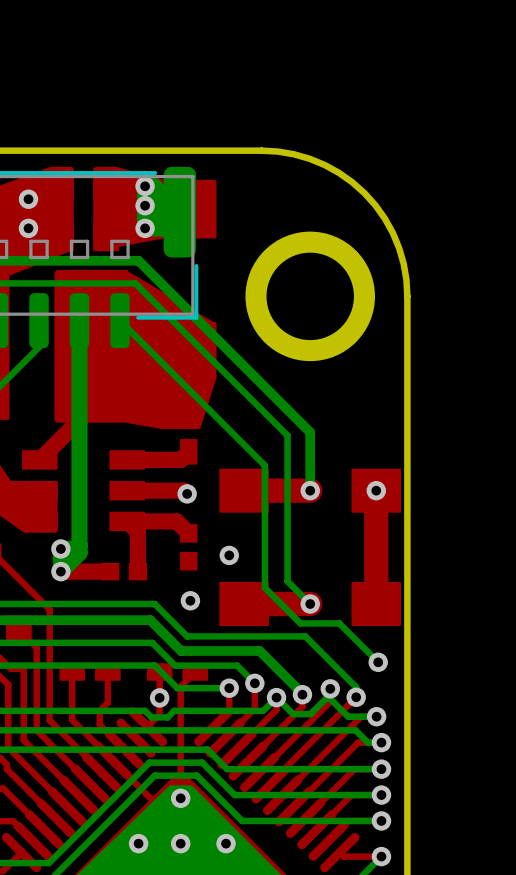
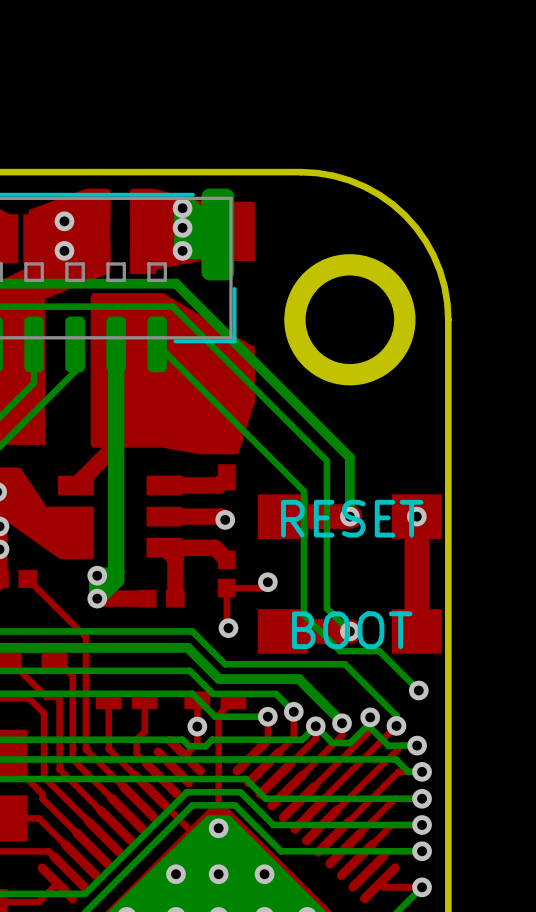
text: none -> RESET (352, 518)
top track: none -> (267, 582) (261, 588) (226, 588) (226, 626) (228, 628)
text: none -> BOOT (352, 630)

